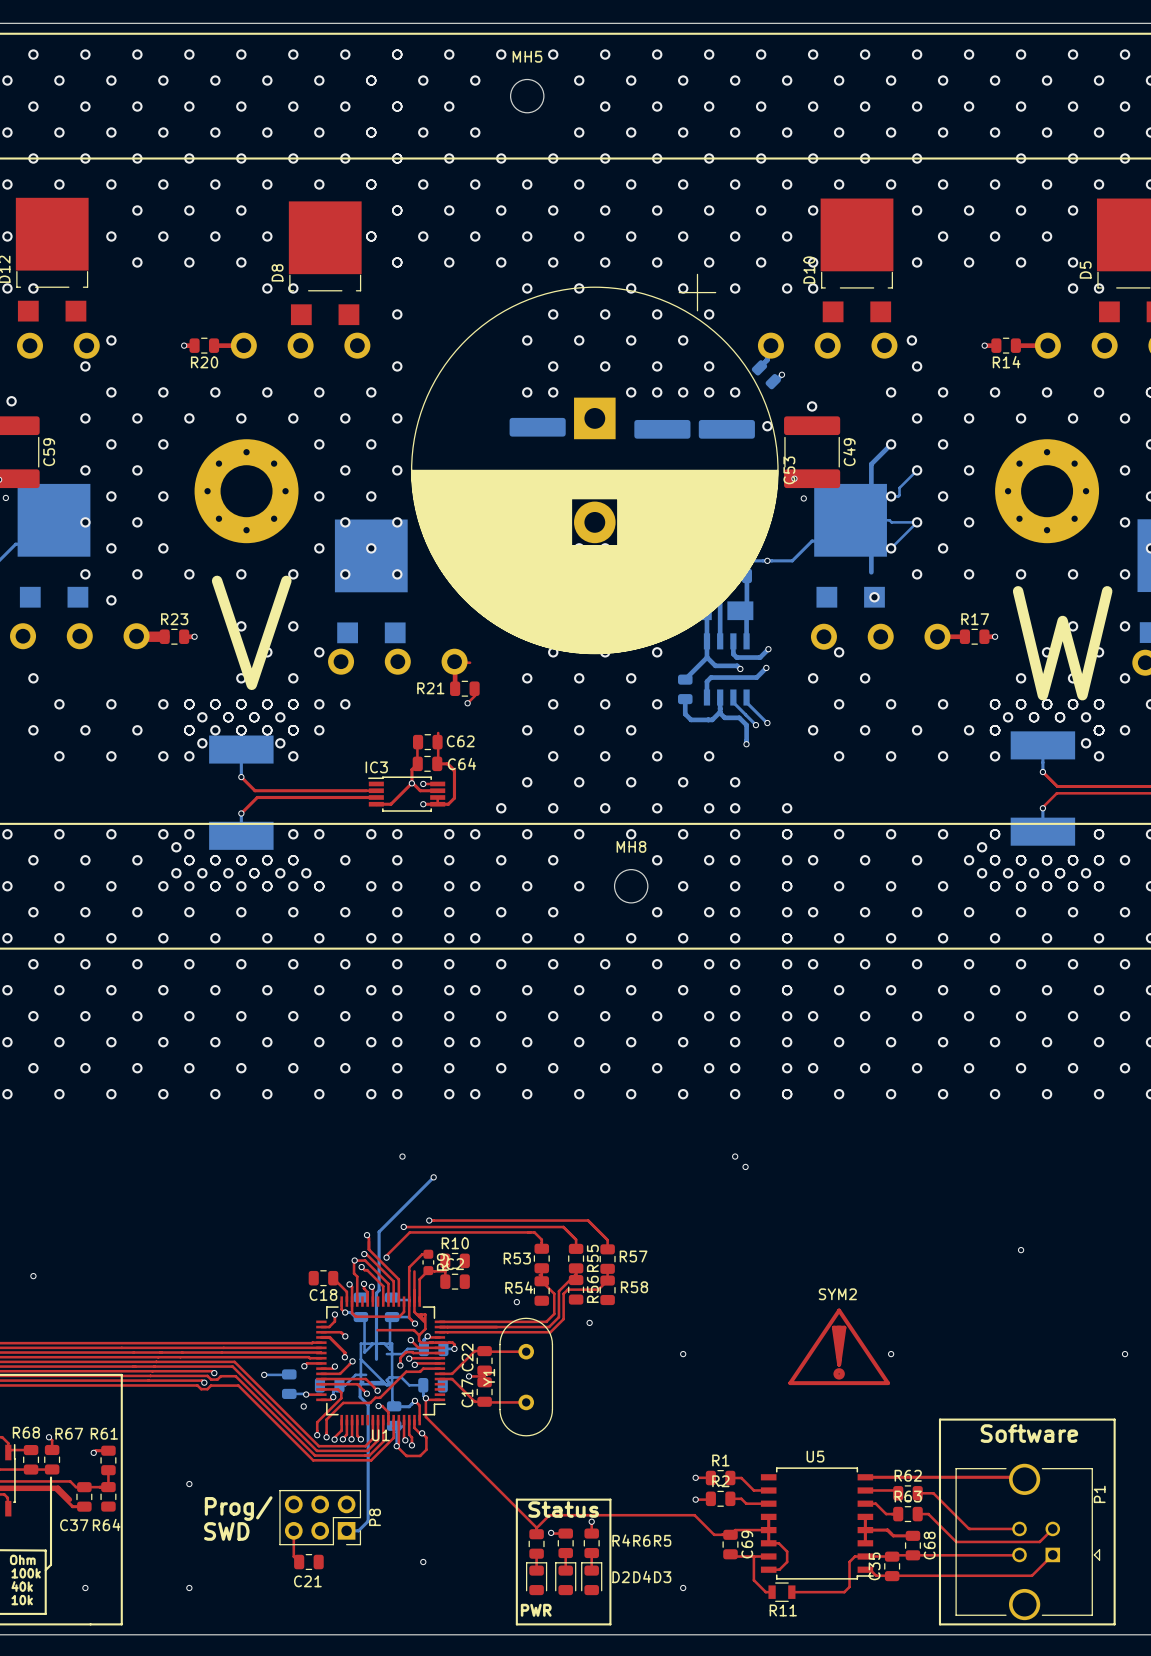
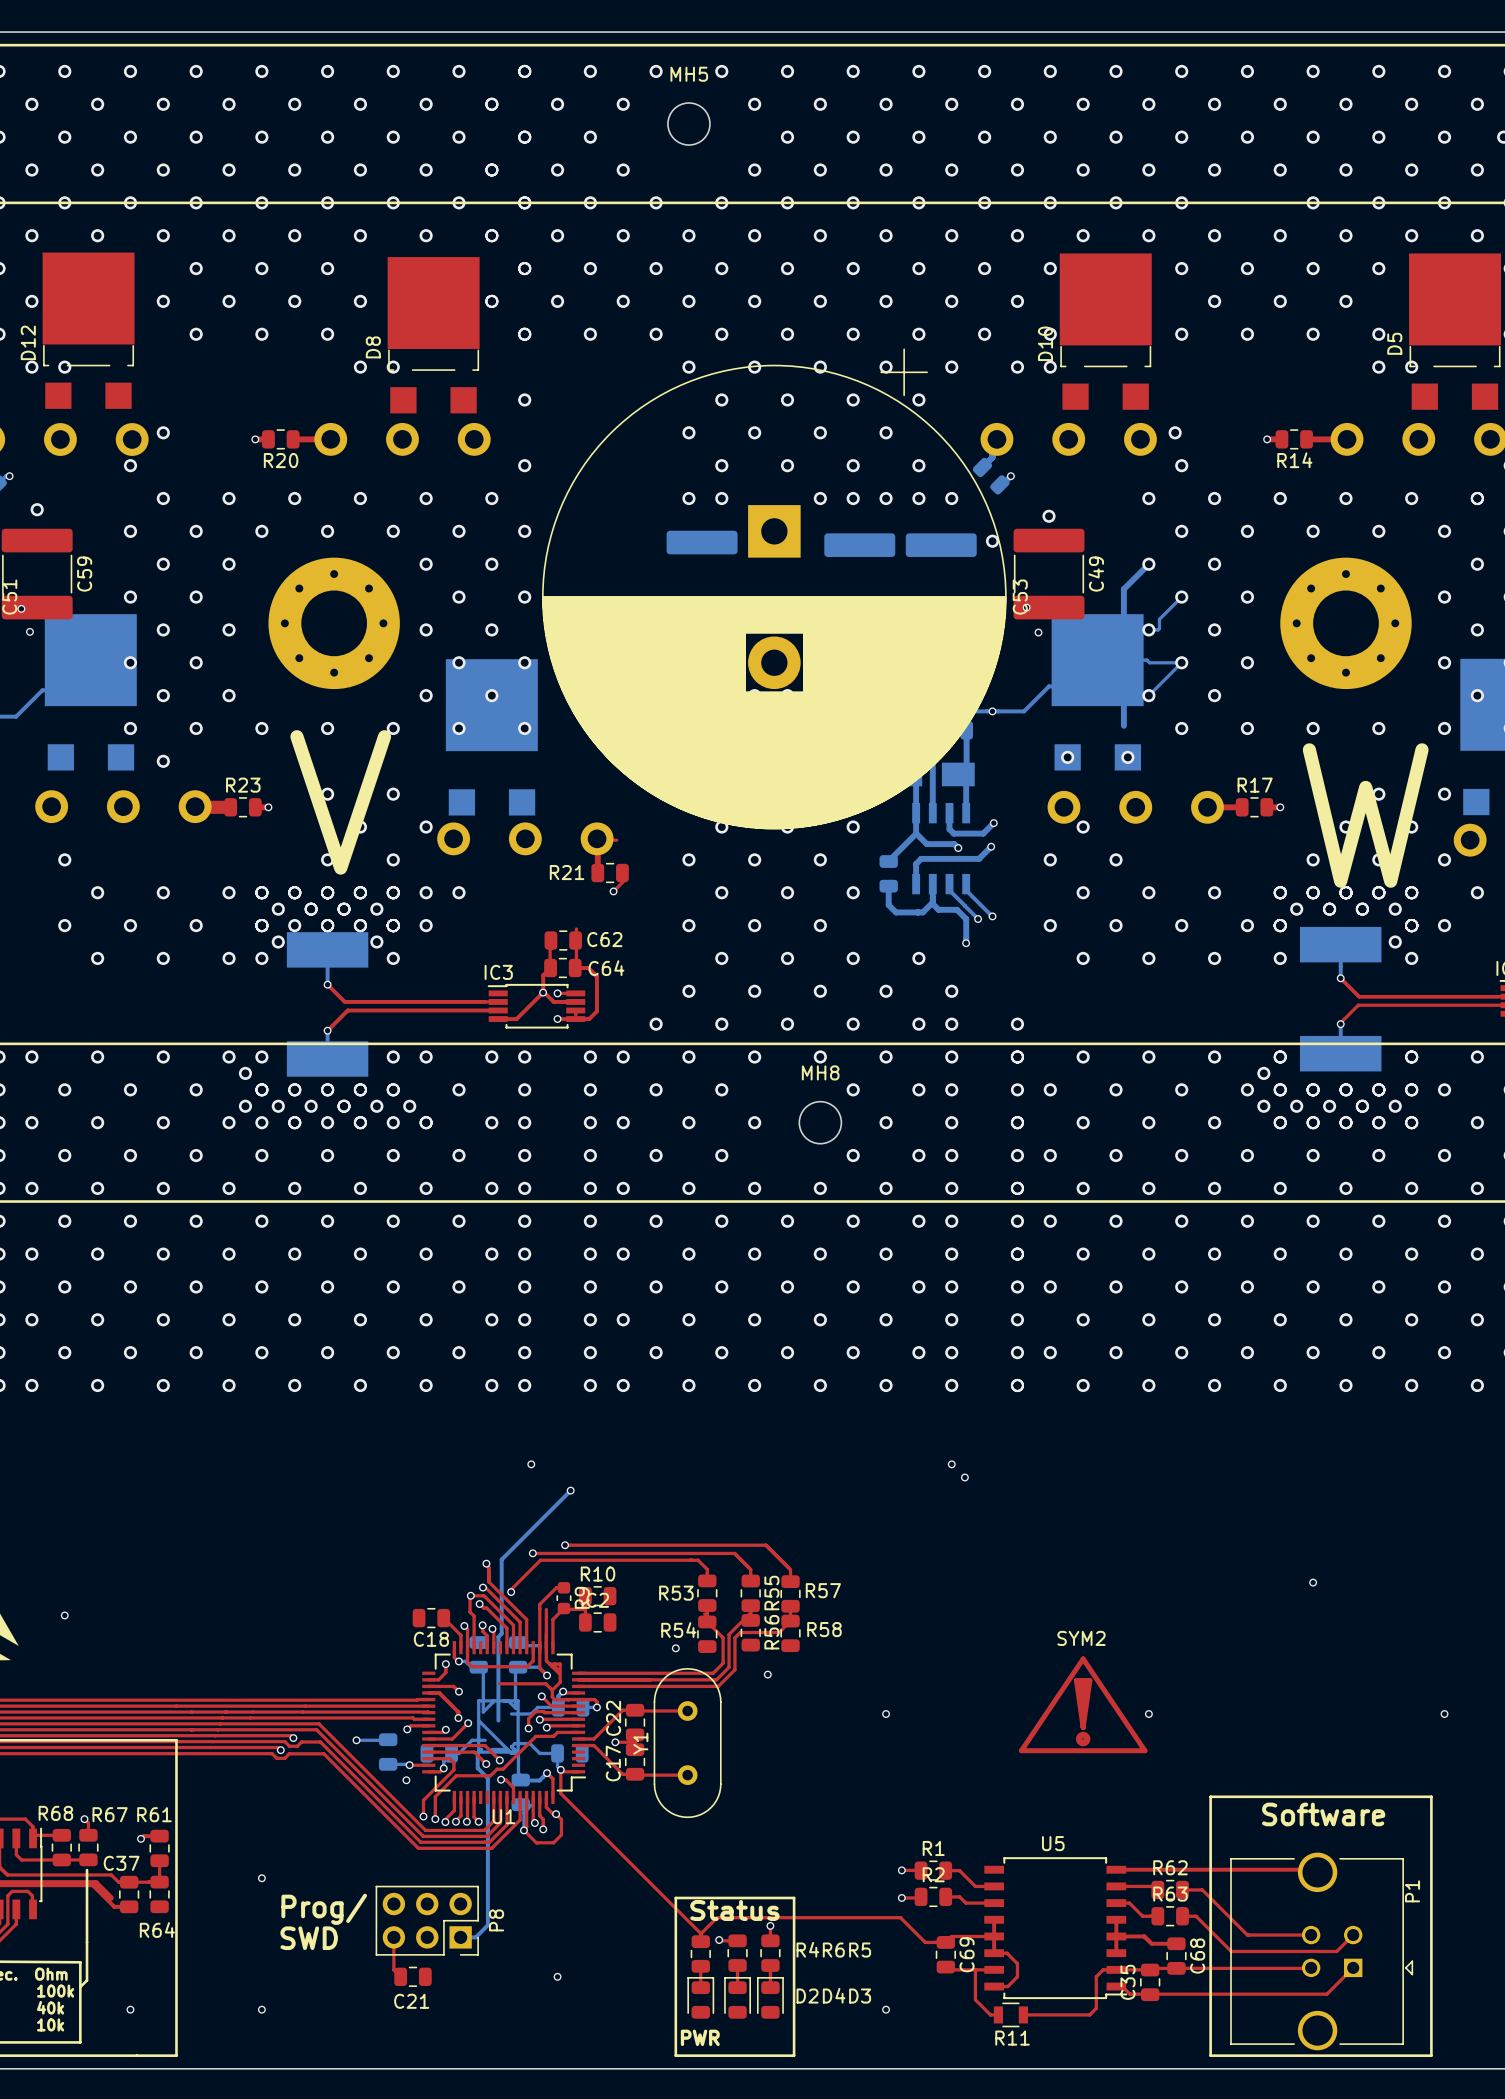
via: none -> (1067, 757)
C37 name position: C37 (74, 1525) -> C37 (121, 1863)

